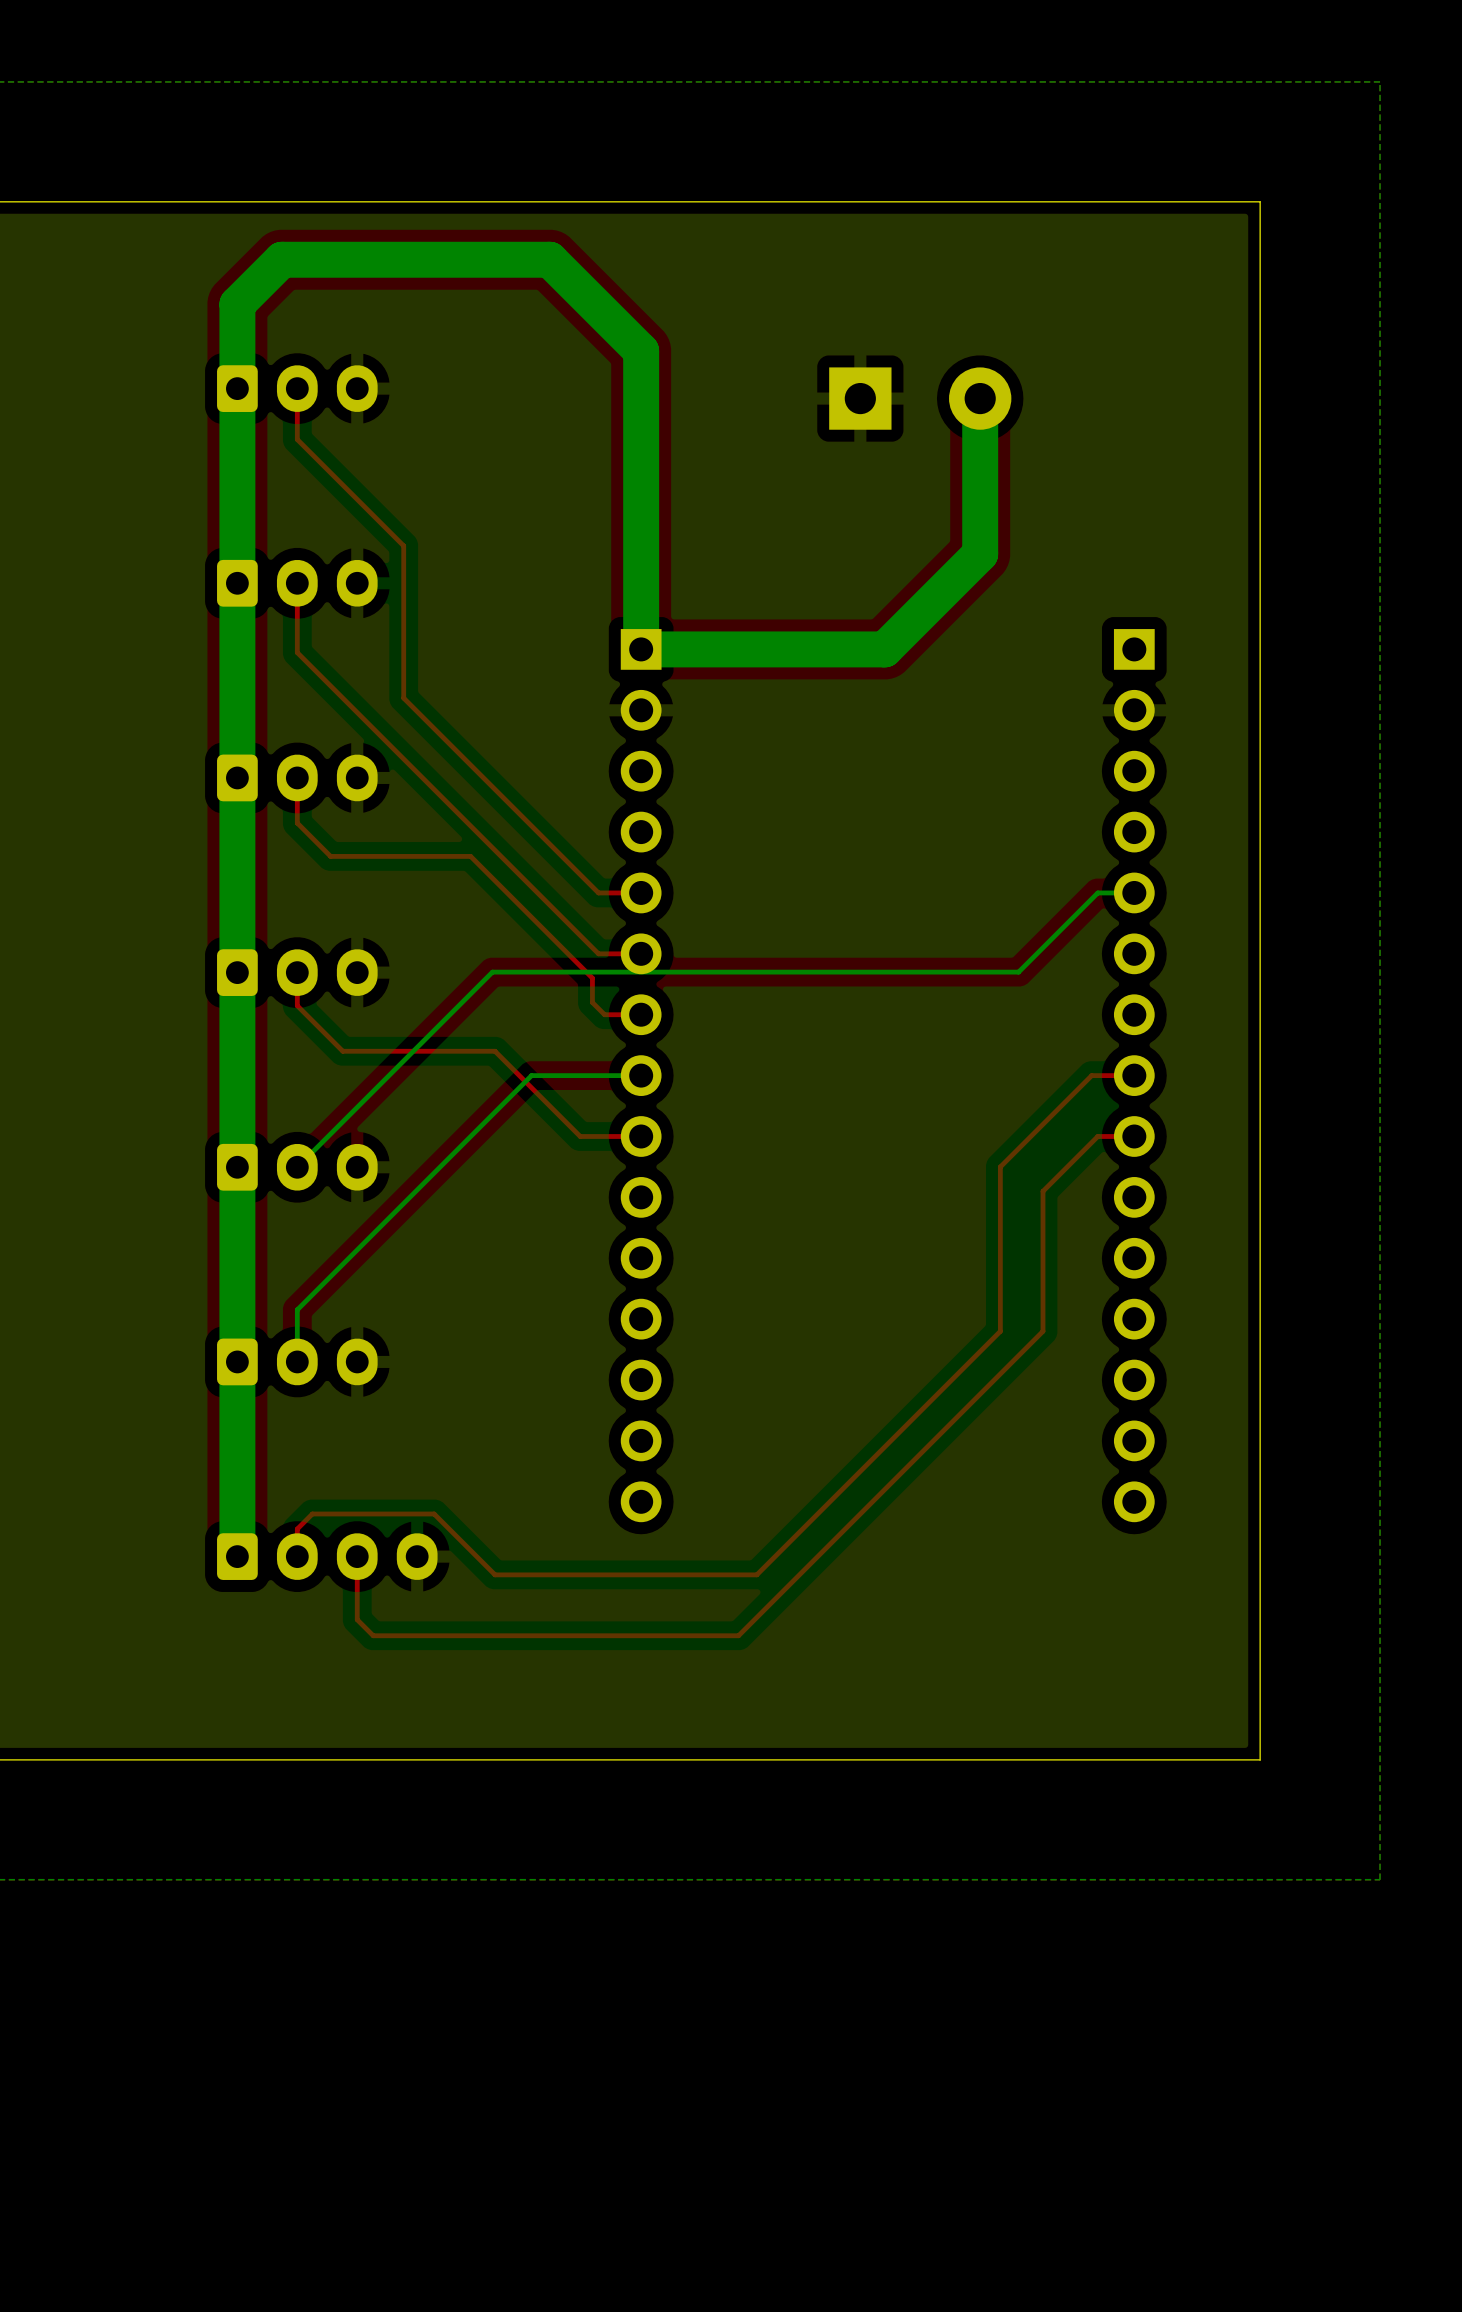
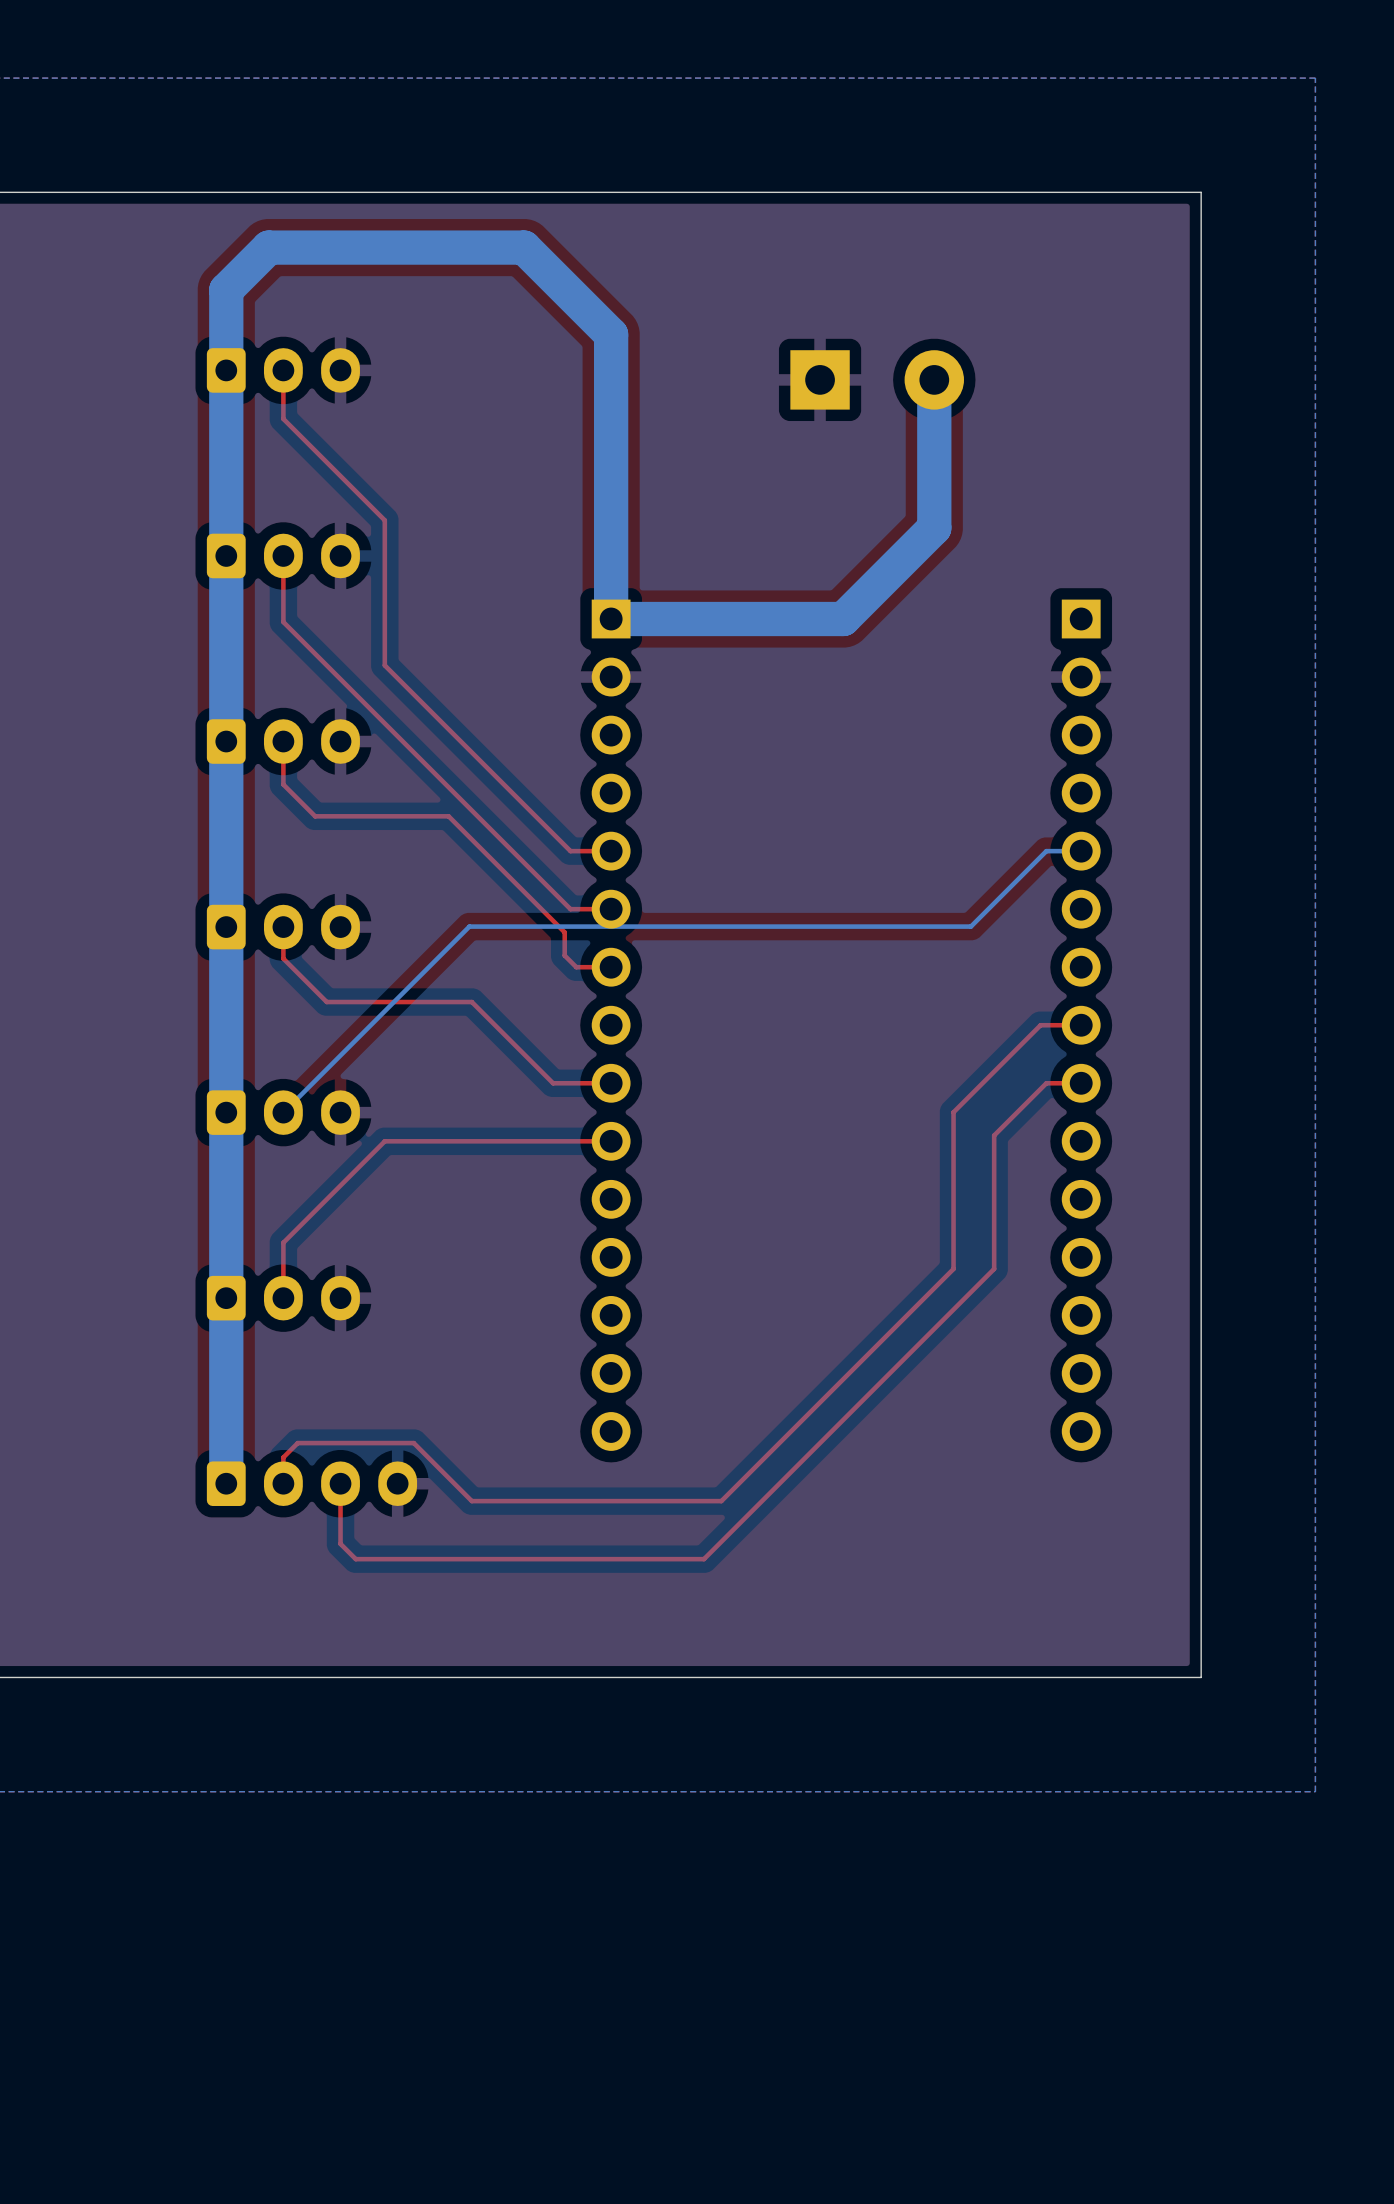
bottom track: (641, 1063) (628, 1075) (531, 1075) (297, 1309) (297, 1361) -> none
top track: none -> (611, 1141) (384, 1141) (283, 1242) (283, 1298)

